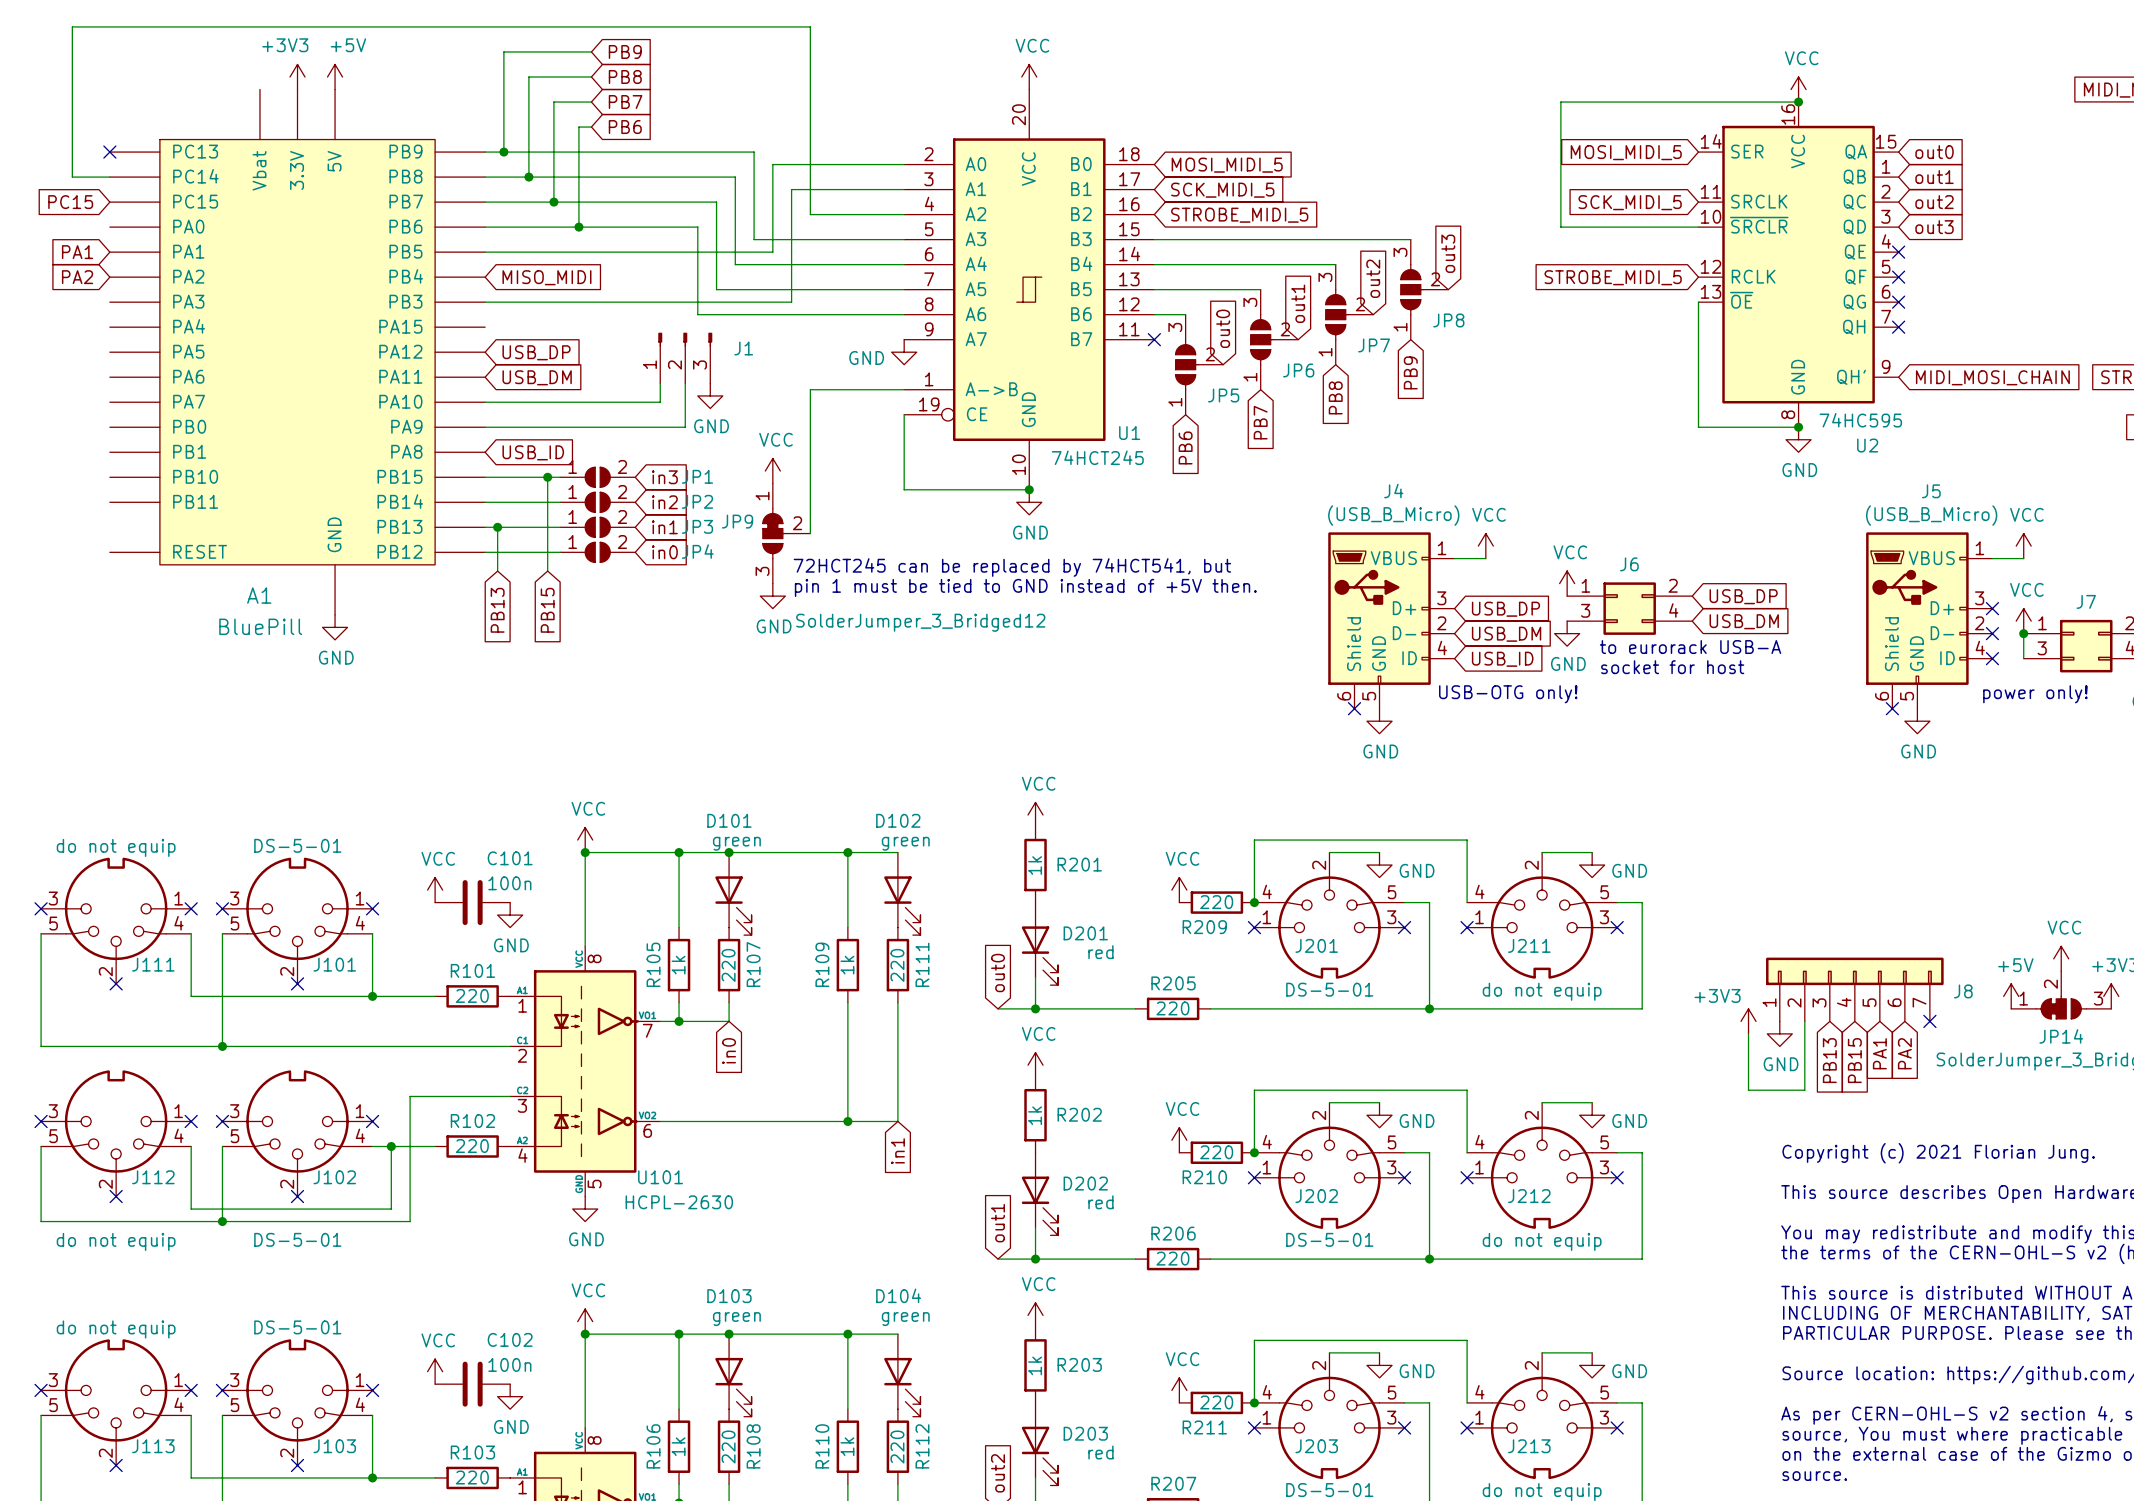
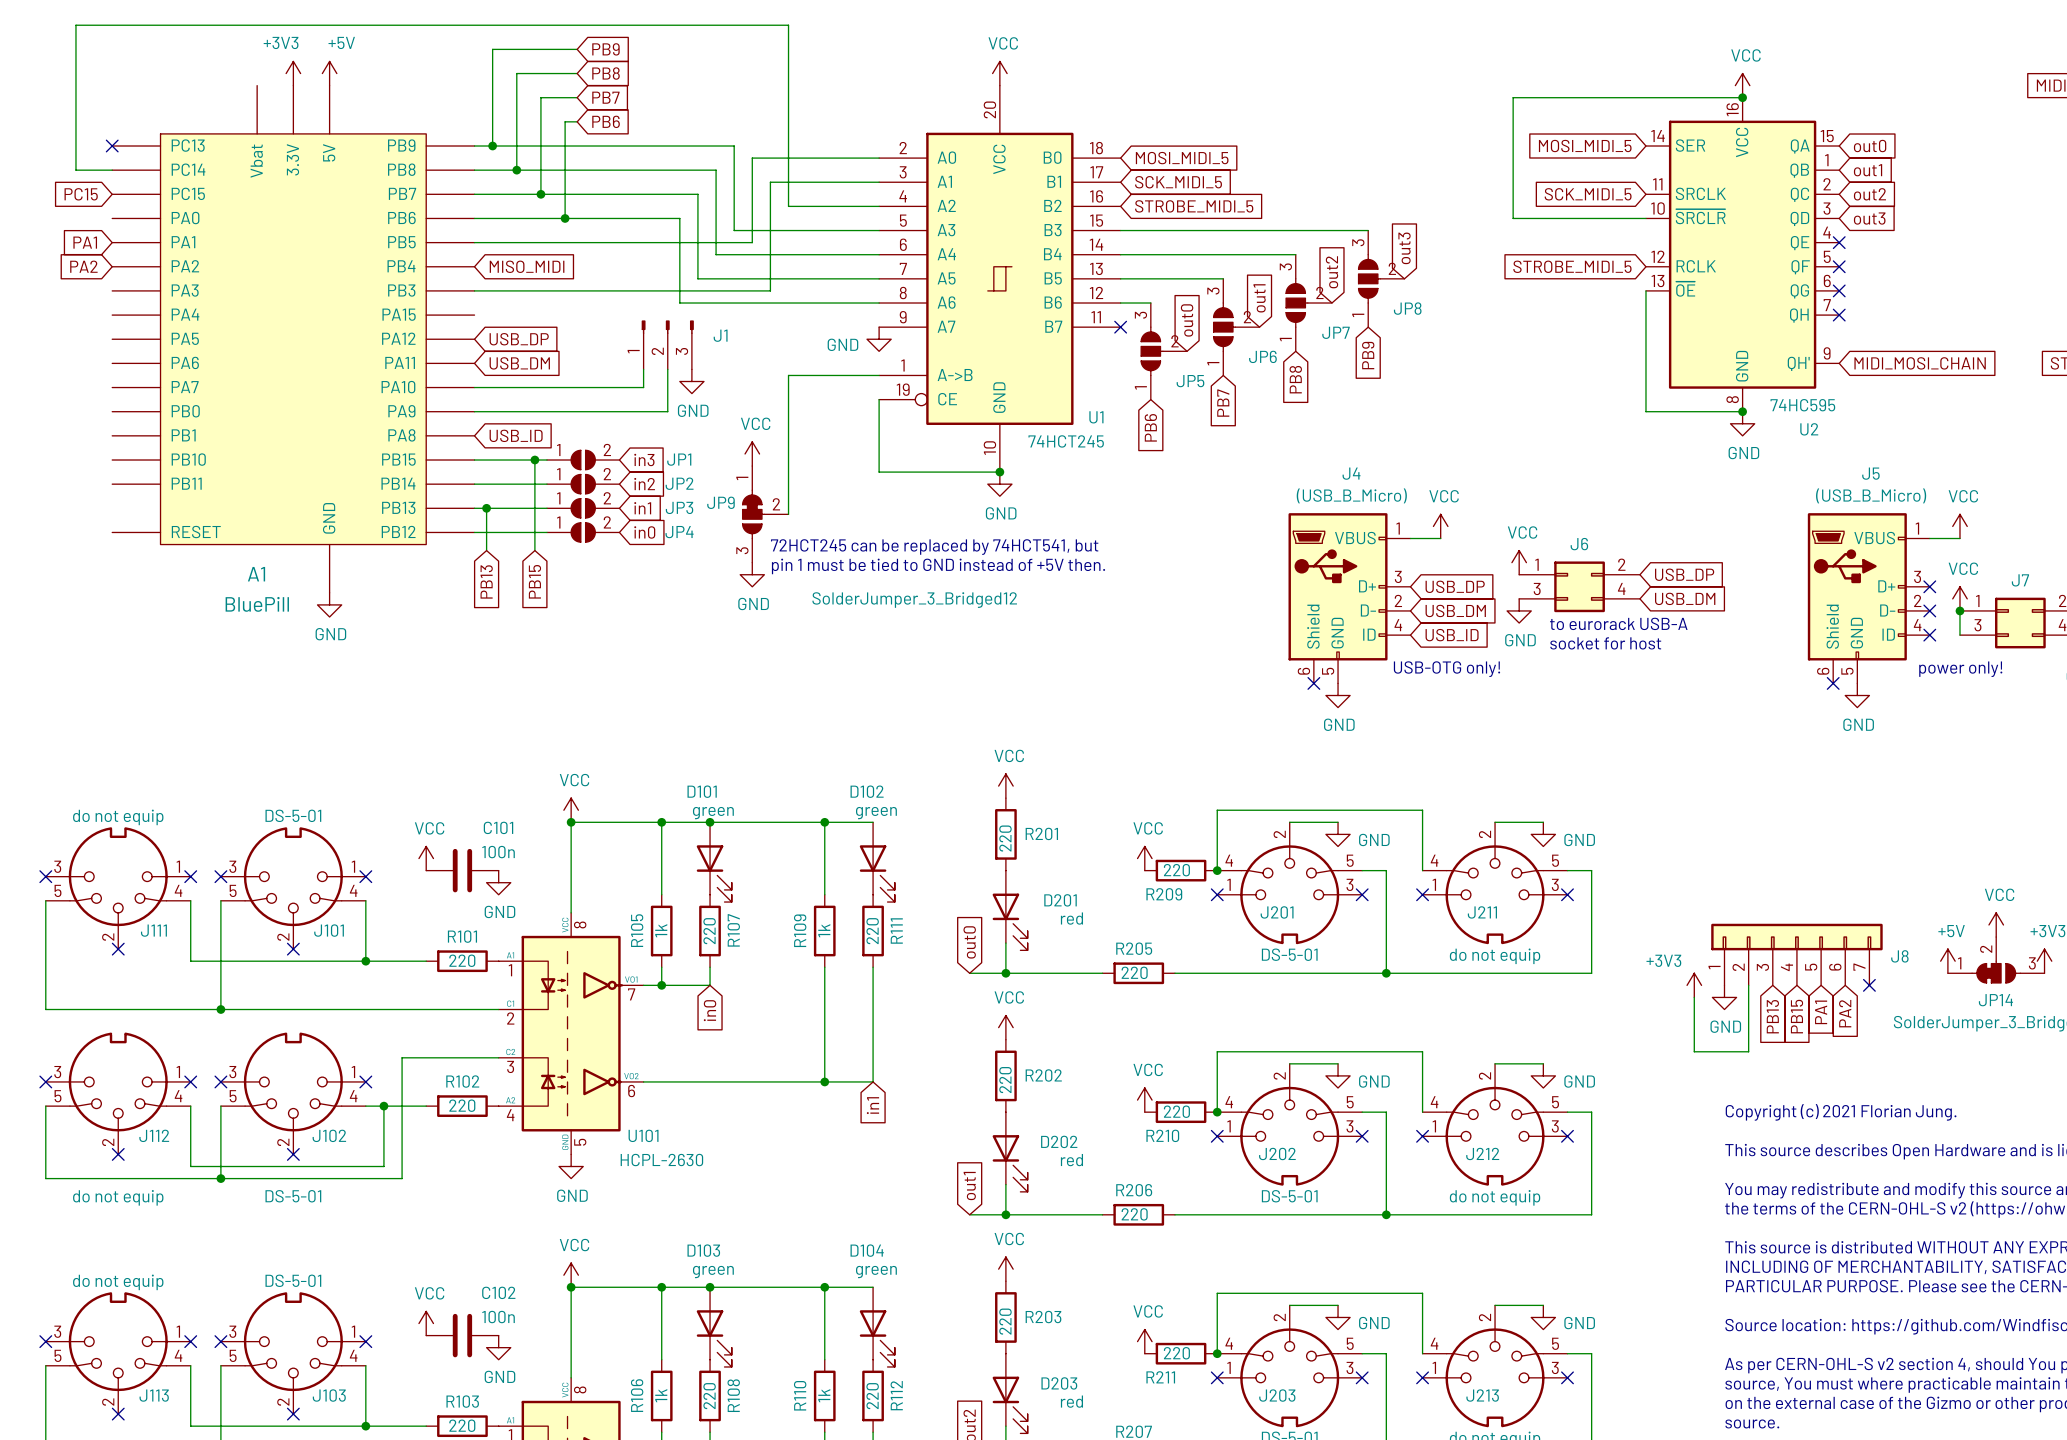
R201 value: 1k (1035, 865) -> 220 (1005, 838)
R202 value: 1k (1035, 1115) -> 220 (1005, 1080)
R203 value: 1k (1035, 1365) -> 220 (1005, 1321)

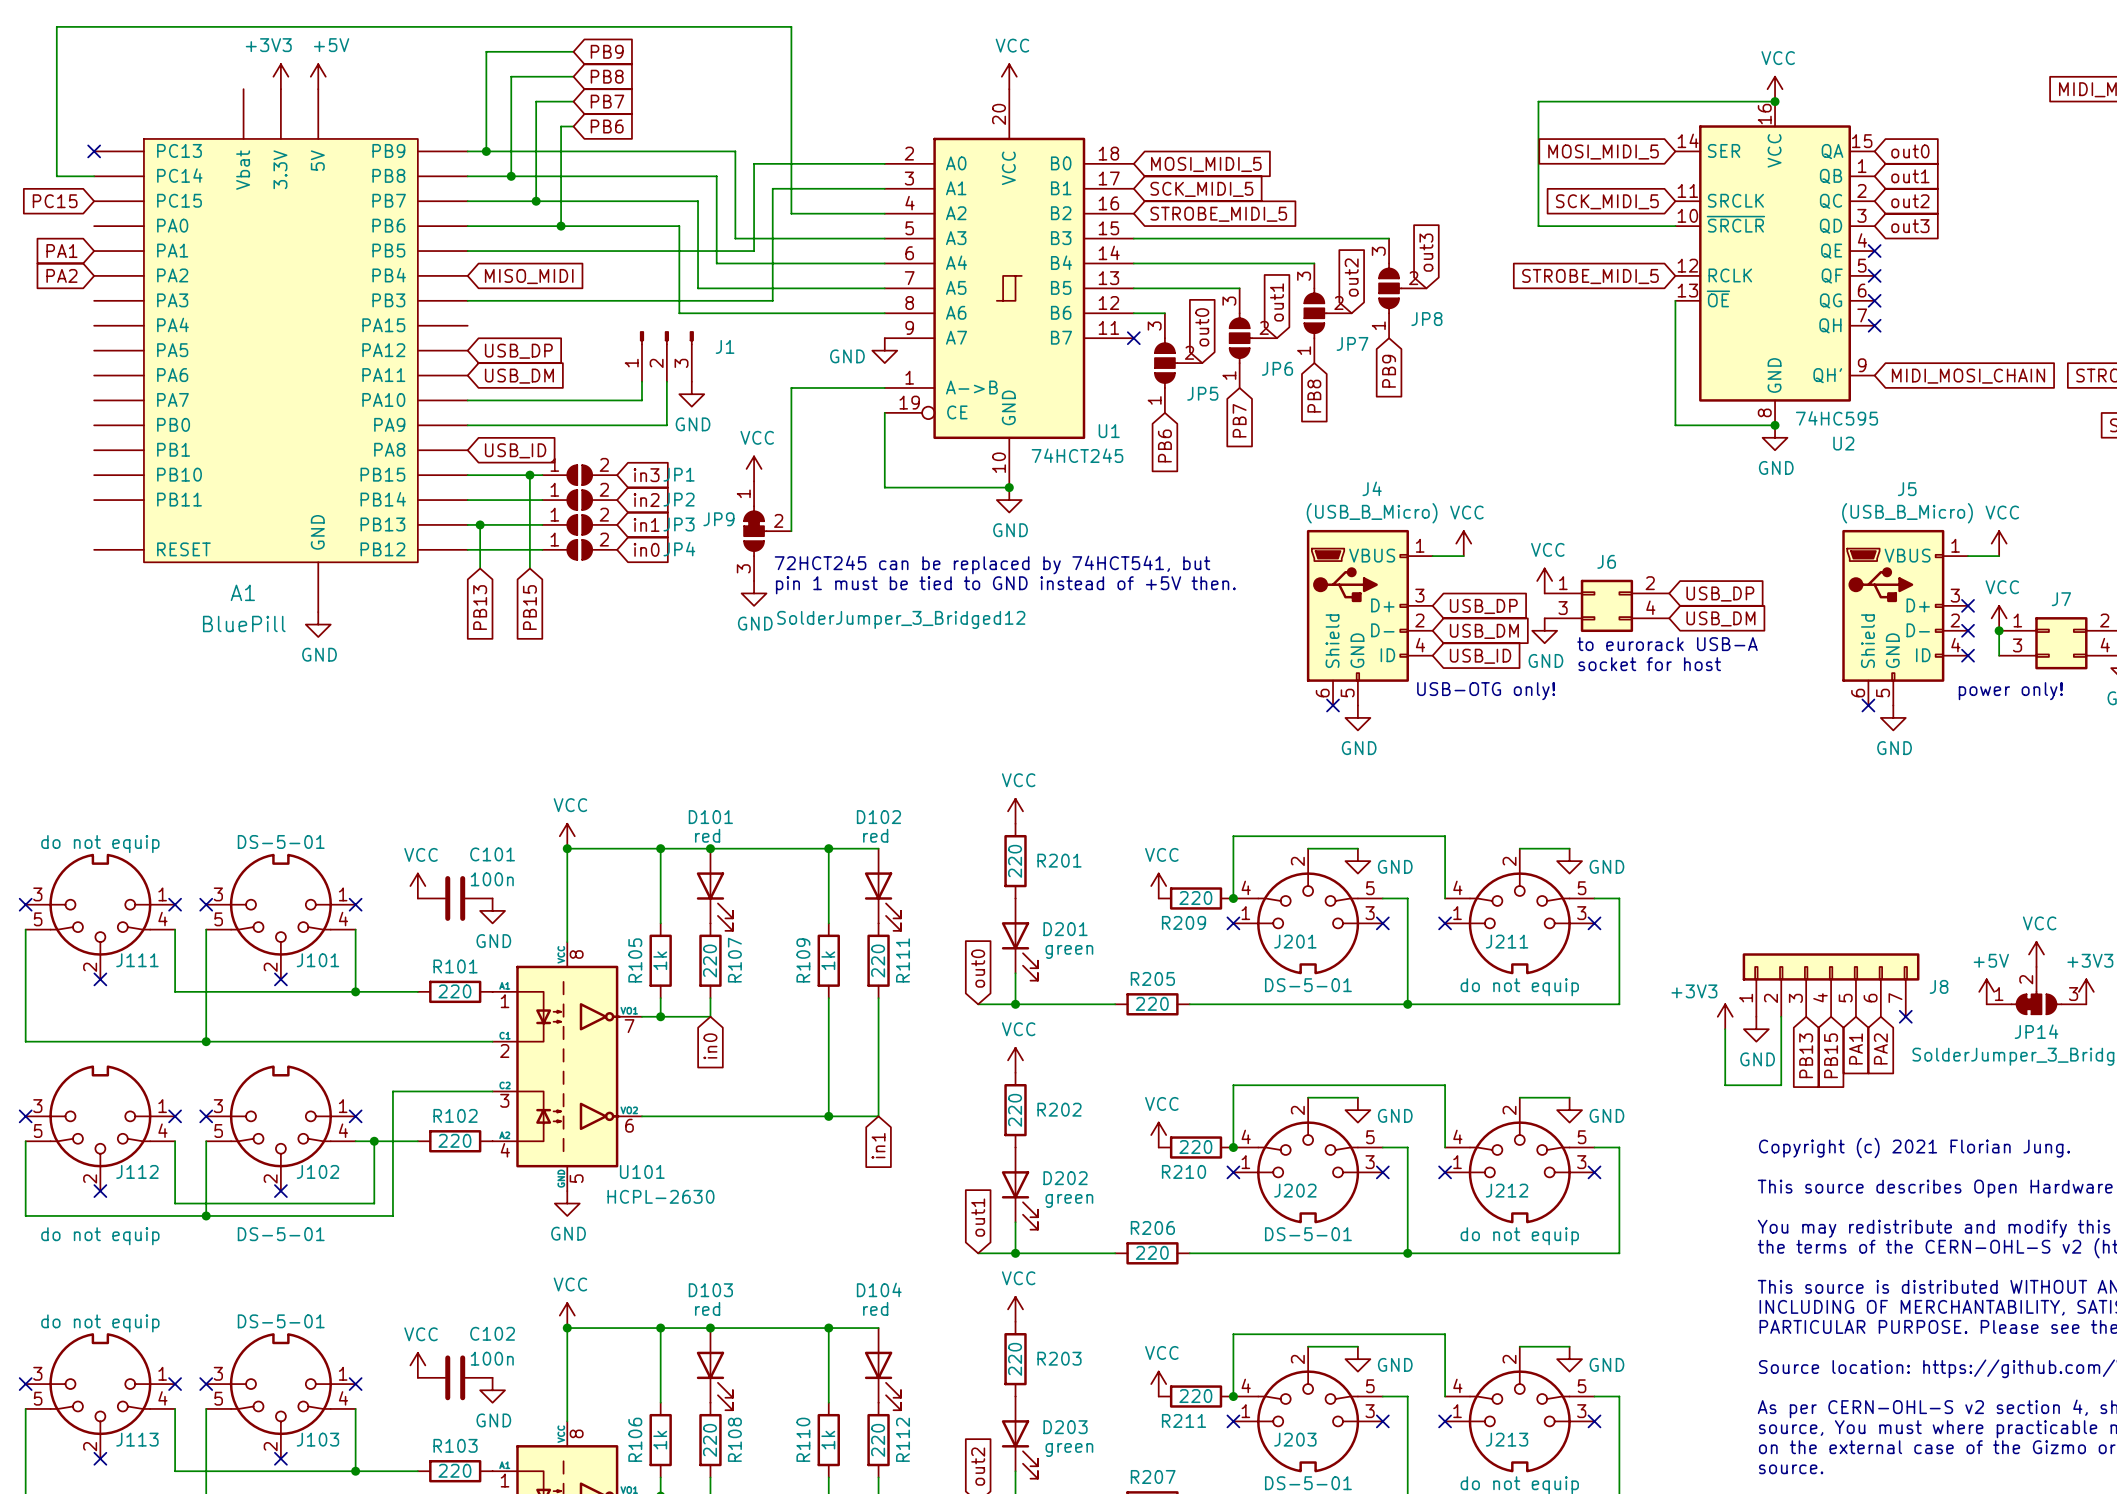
D101 value: green (713, 813) -> red (707, 835)
D102 value: green (876, 813) -> red (875, 835)
D201 value: red (1071, 918) -> green (1069, 951)
D202 value: red (1071, 1160) -> green (1069, 1200)
D103 value: green (713, 1272) -> red (707, 1308)
D104 value: green (876, 1272) -> red (875, 1308)
D203 value: red (1071, 1401) -> green (1069, 1450)

